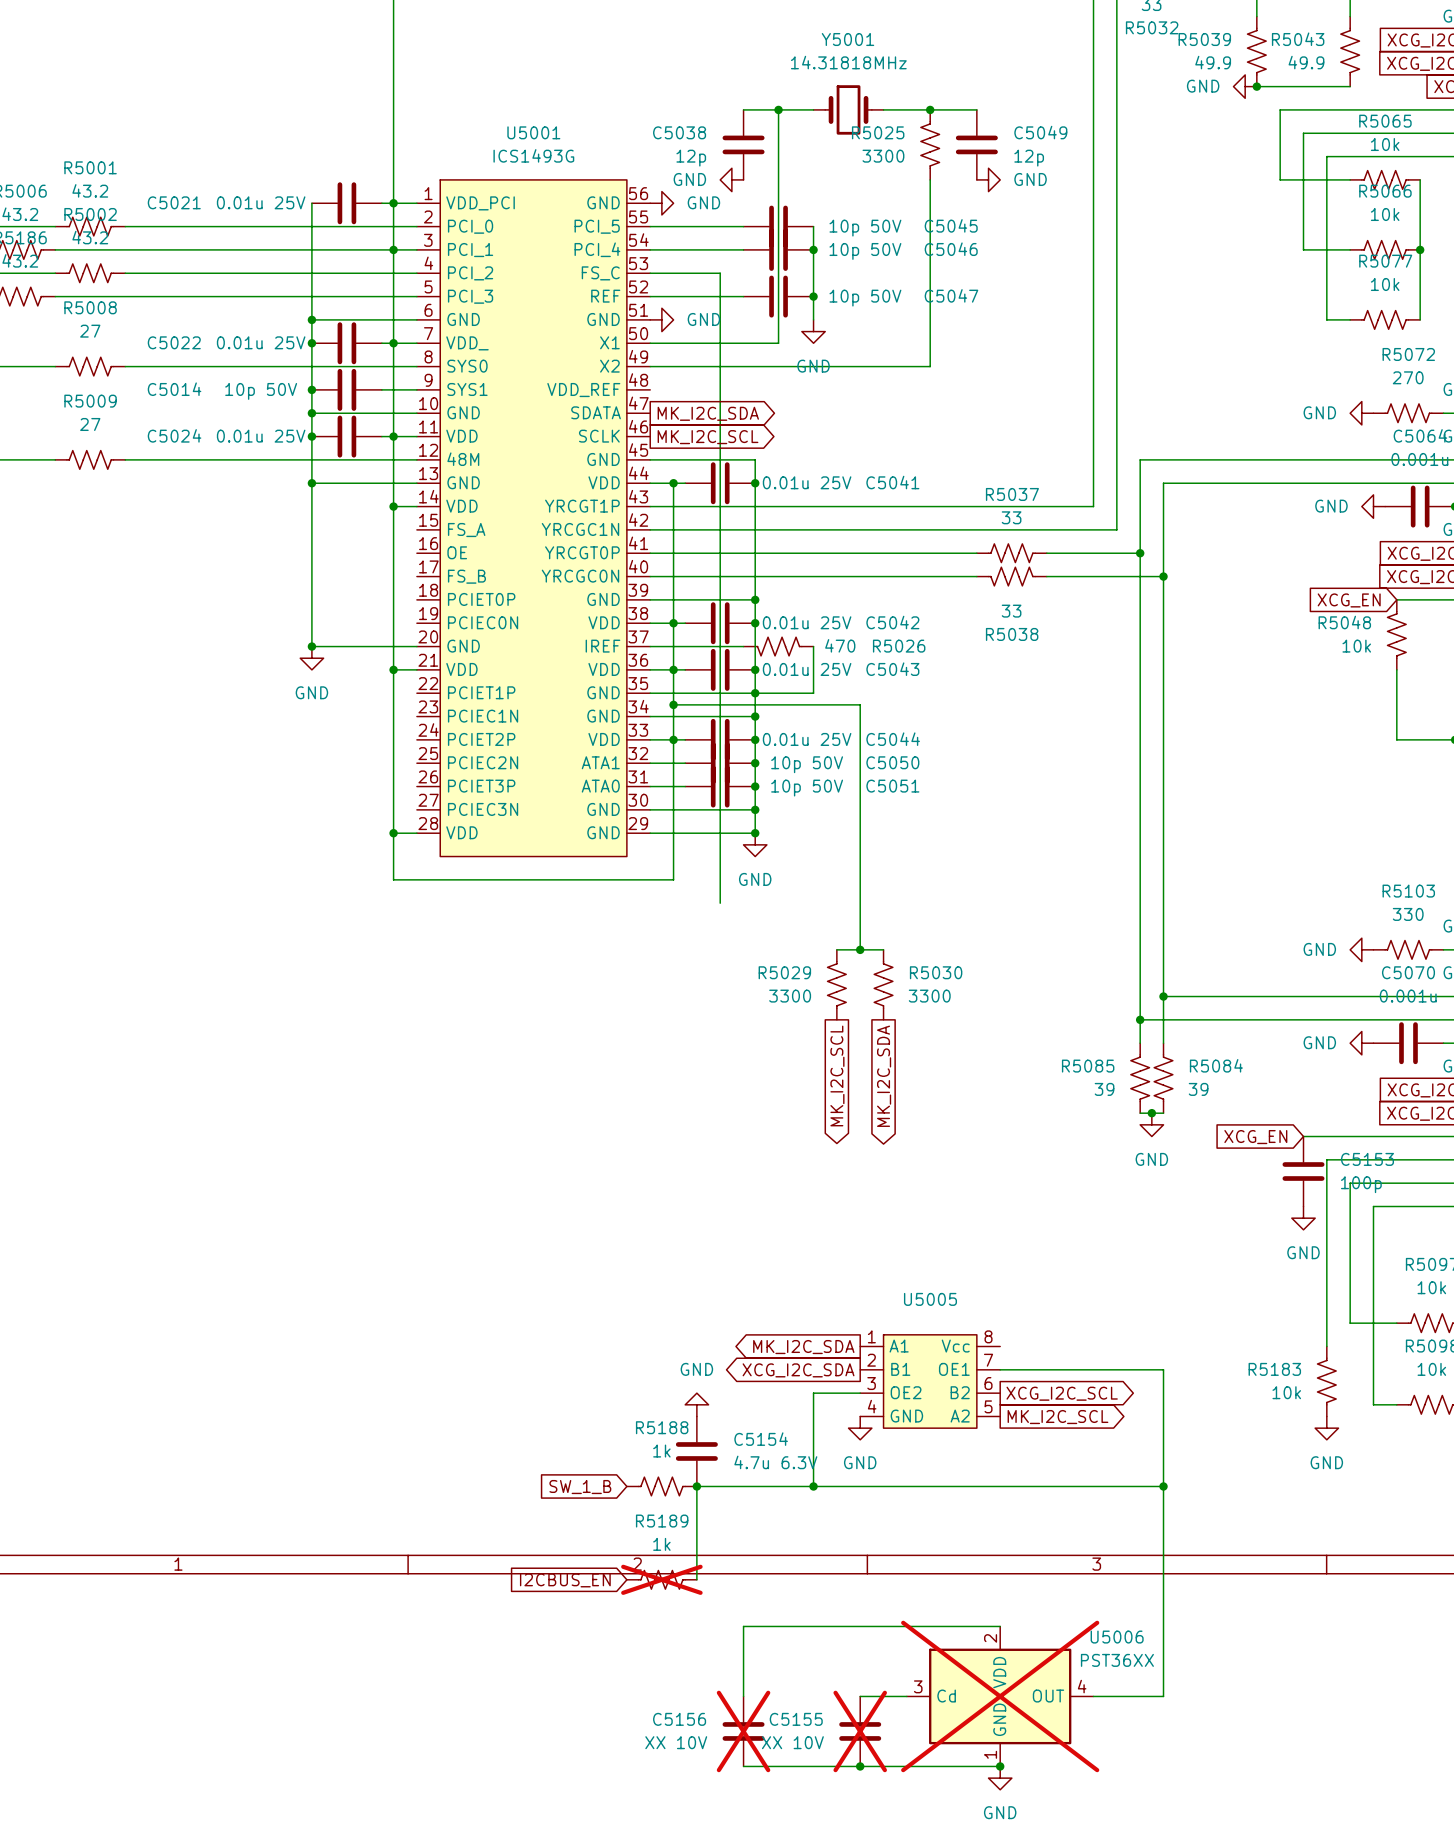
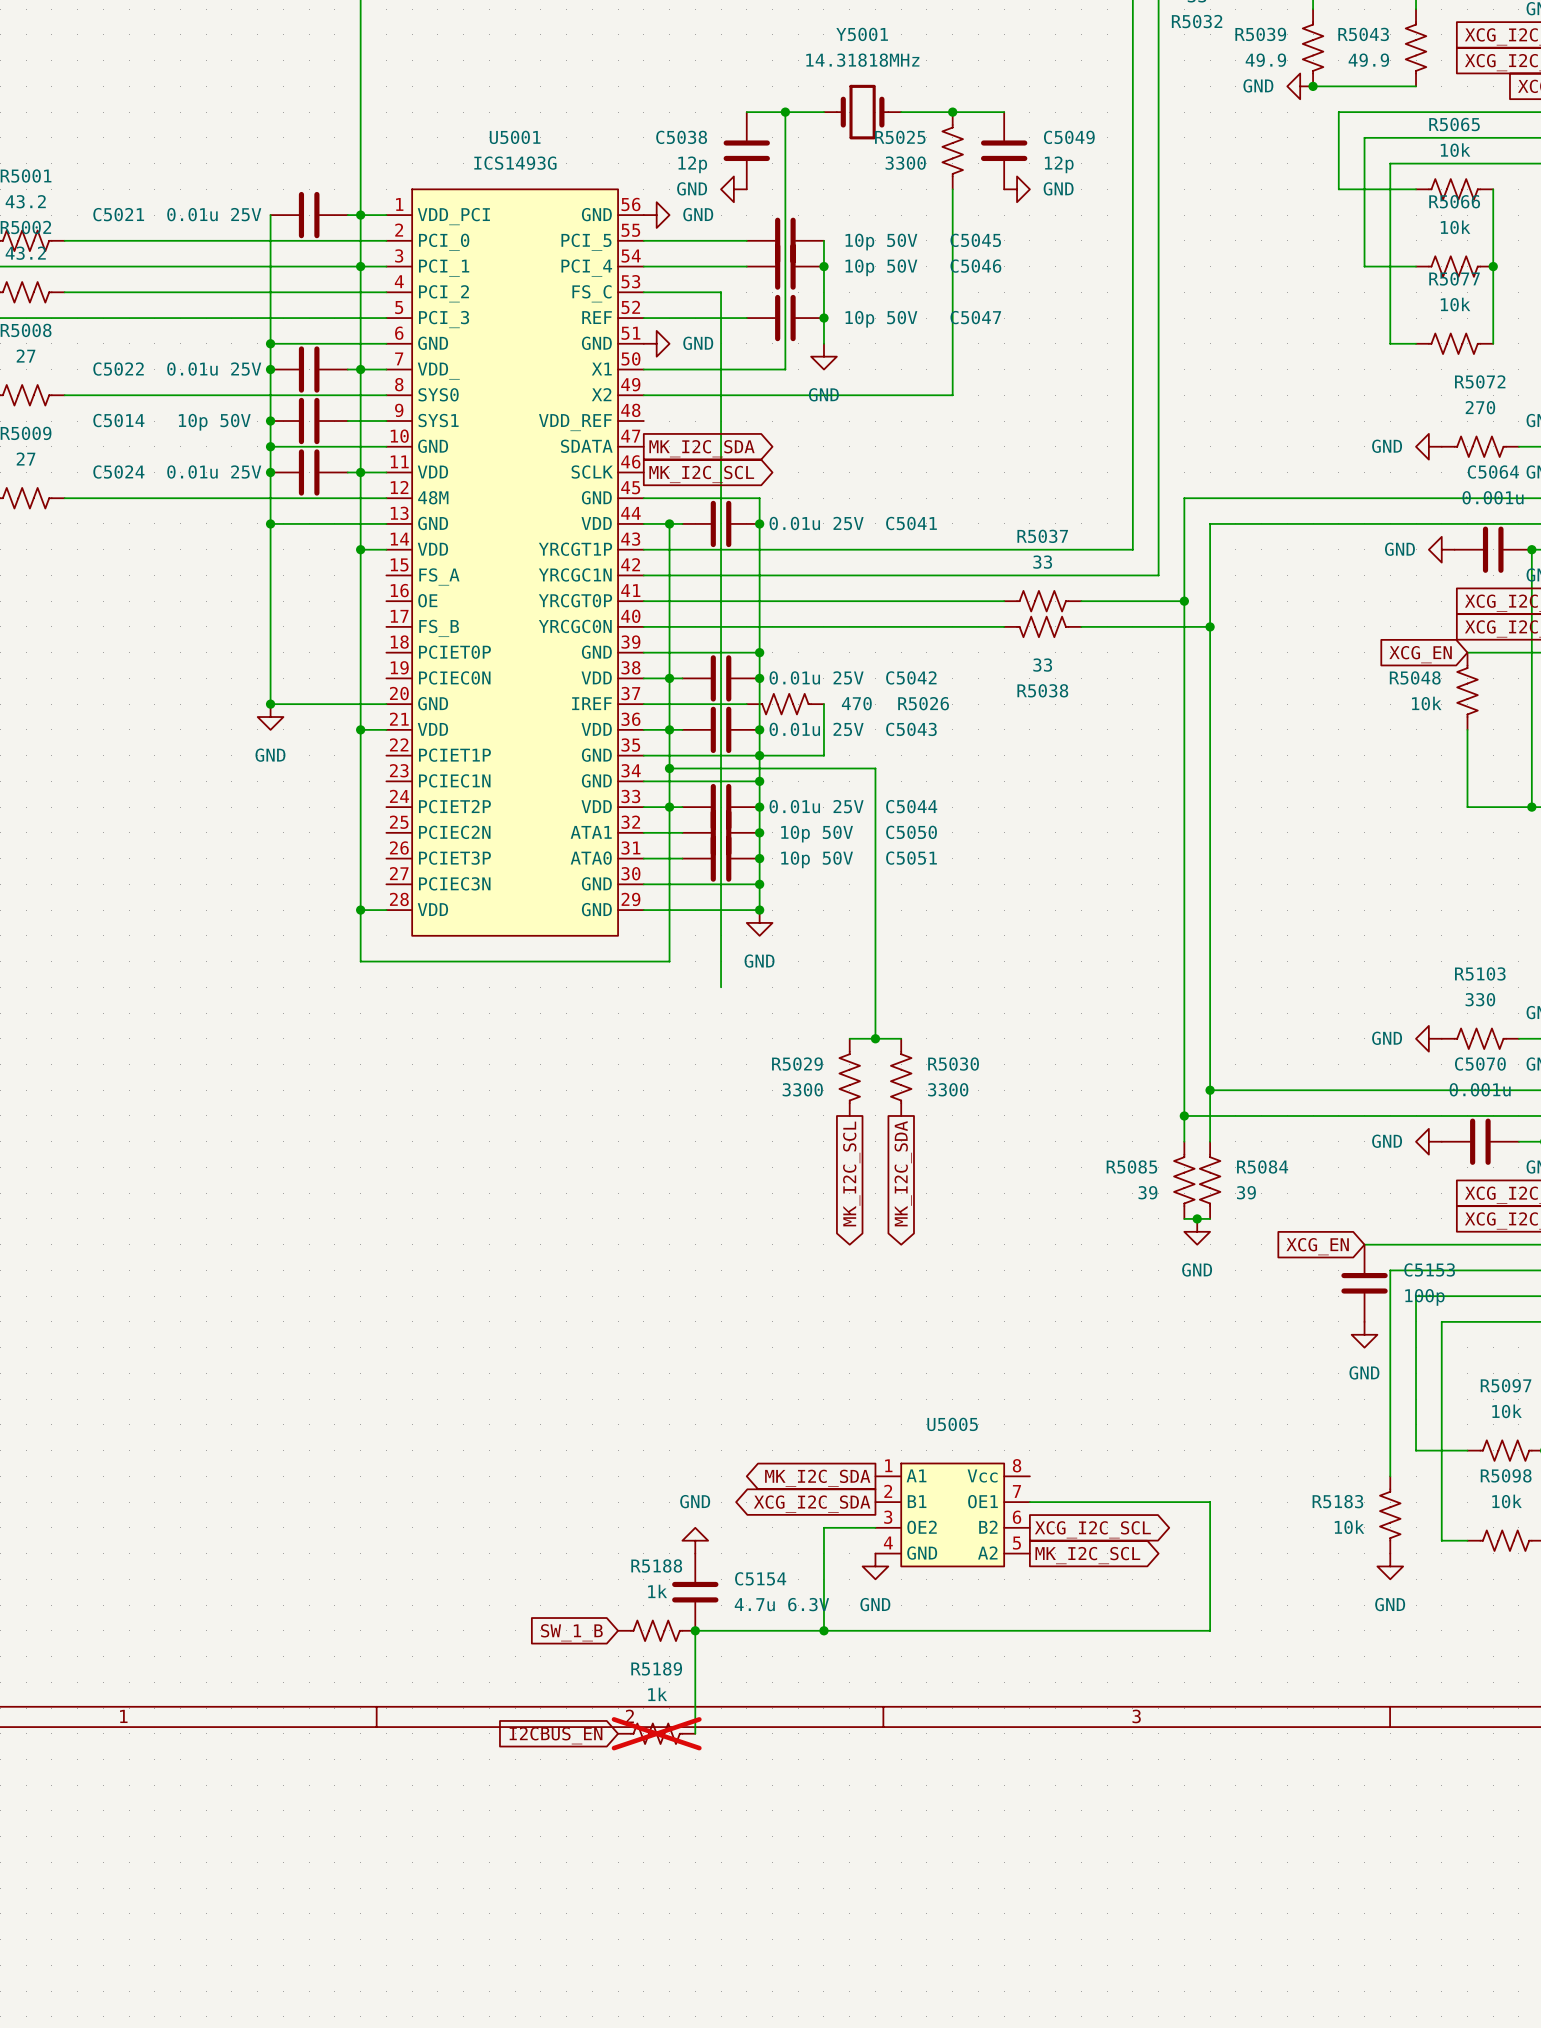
wire: (1163, 1486) (1163, 1696) (1093, 1696) -> none
junction: (1163, 1486) -> none
wire: (1000, 1626) (743, 1626) (743, 1696) -> none
wire: (860, 1696) (906, 1696) -> none
U5006: PST36XX (1000, 1696) -> none
C5156: XX 10V (743, 1731) -> none
C5155: XX 10V (860, 1731) -> none
wire: (743, 1766) (1000, 1766) -> none
junction: (860, 1766) -> none
junction: (1000, 1766) -> none
power symbol: GND (1000, 1778) -> none

